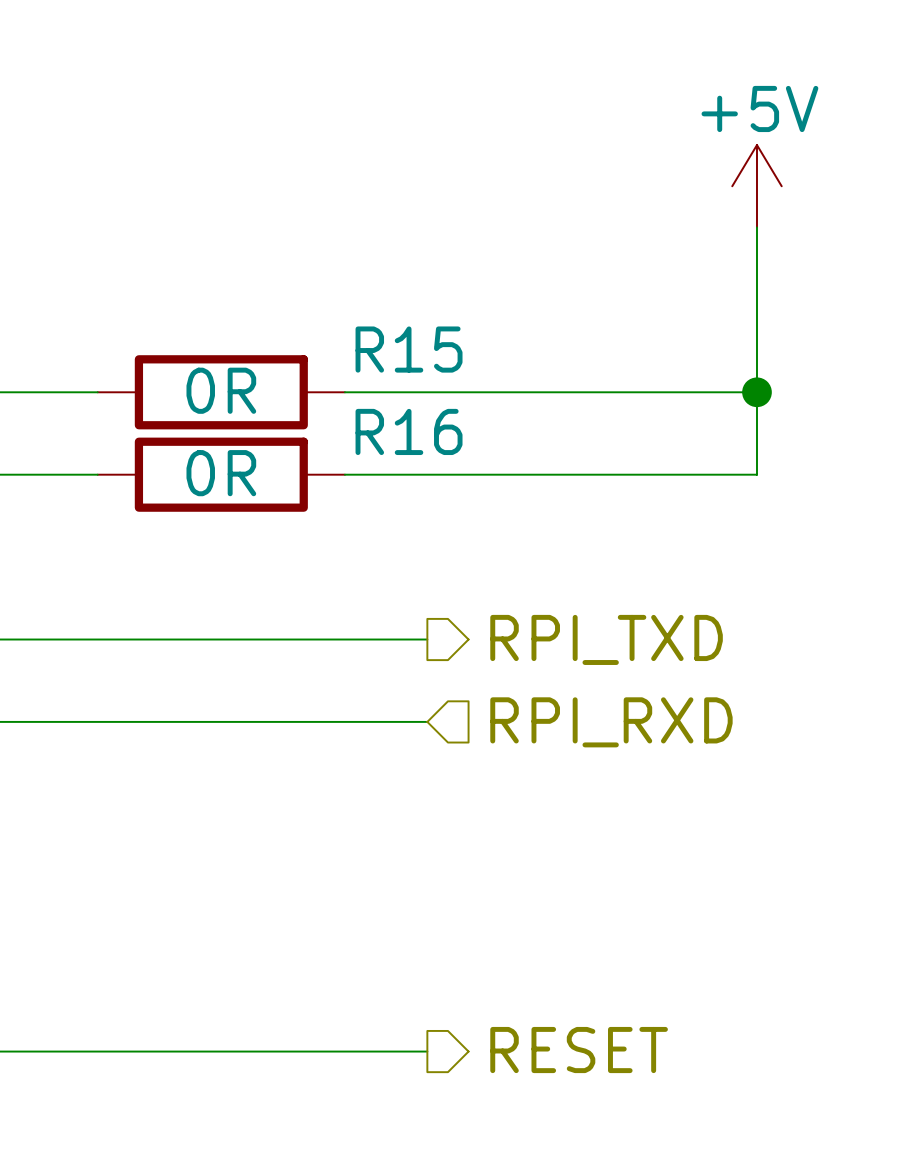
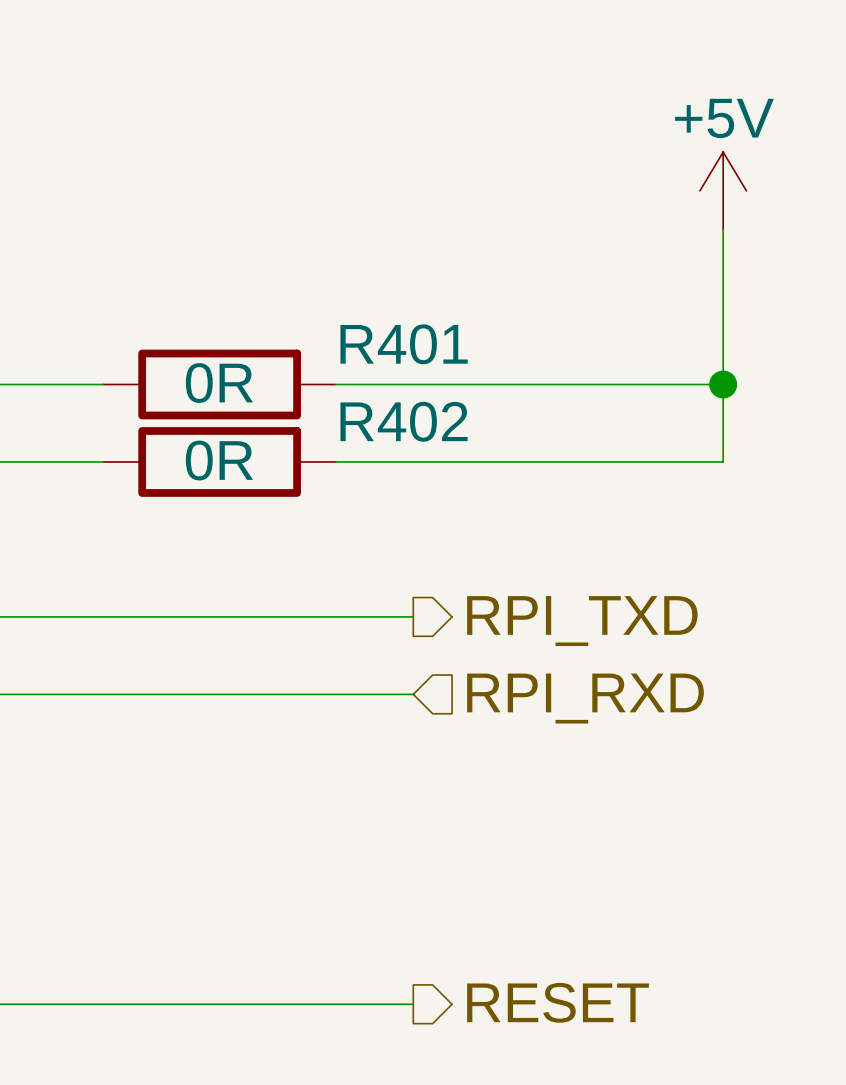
R15 name: R15 (409, 349) -> R401 (404, 344)
R16 name: R16 (409, 431) -> R402 (404, 421)

